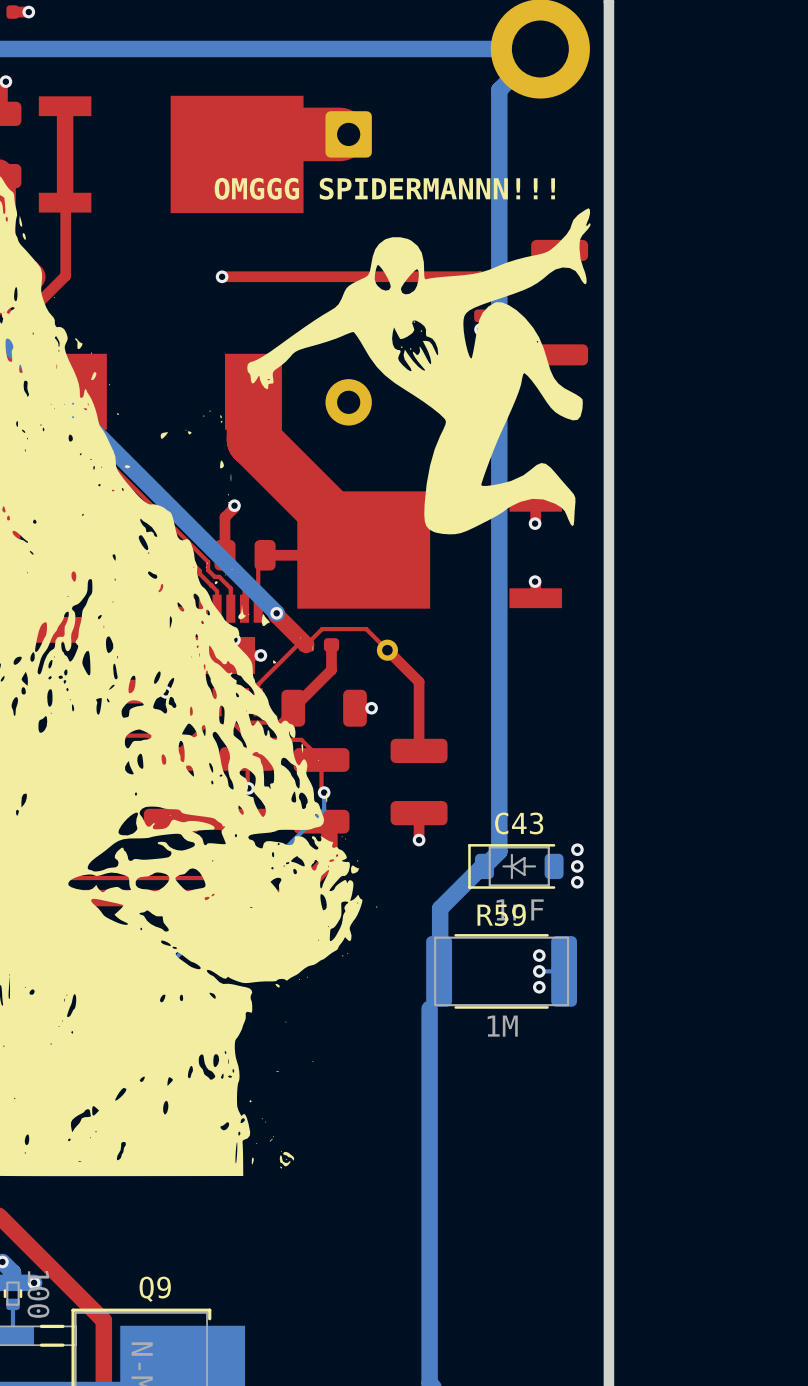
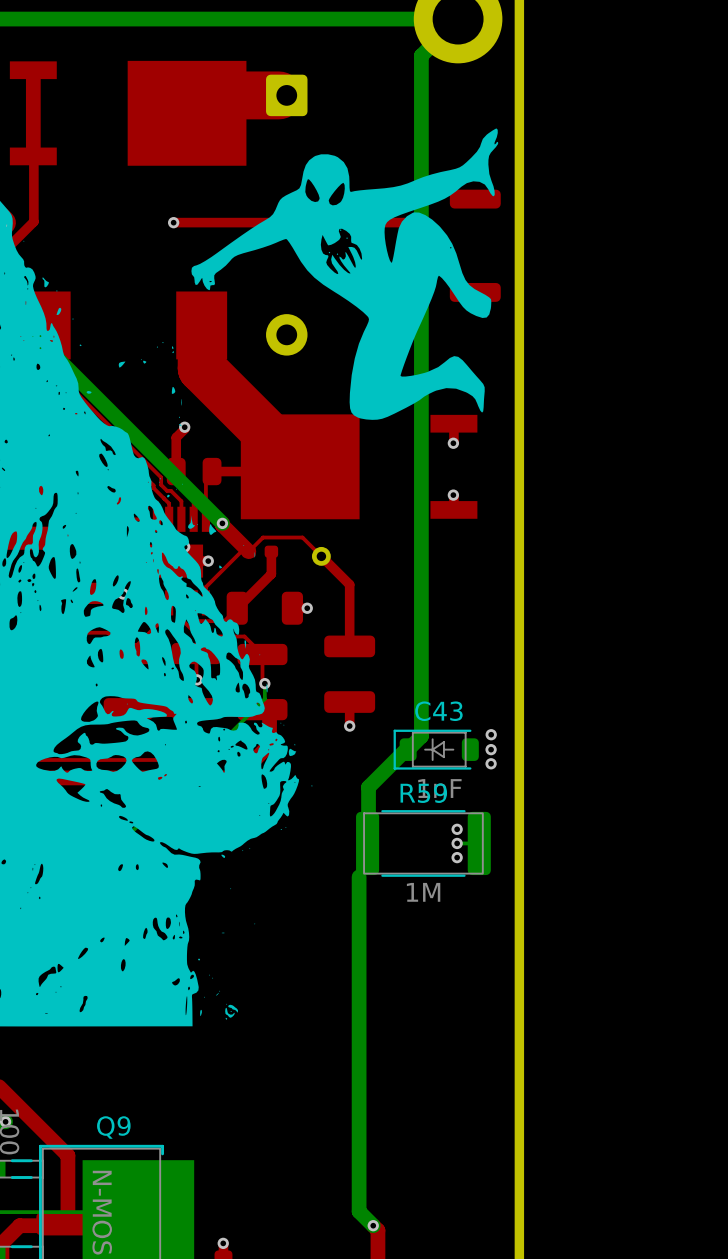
text: OMGGG SPIDERMANNN!!! (384, 188) -> none
drawing position: (418, 371) -> (344, 274)

